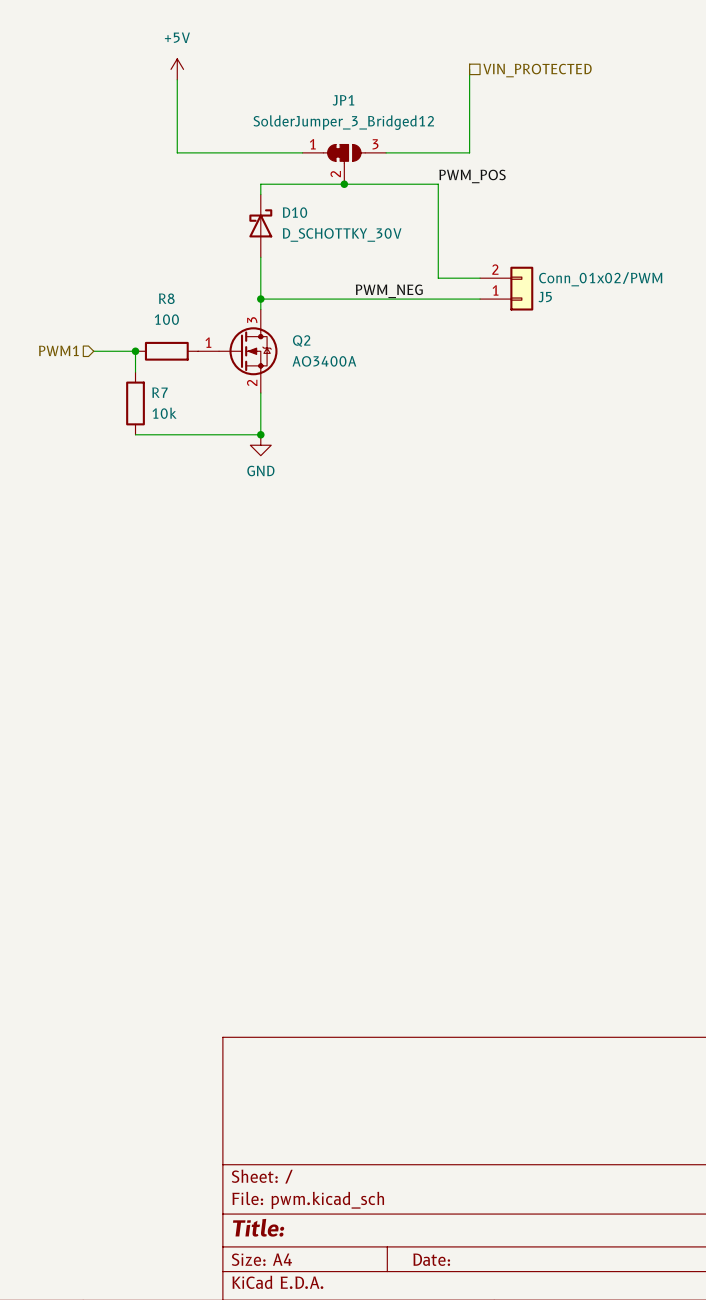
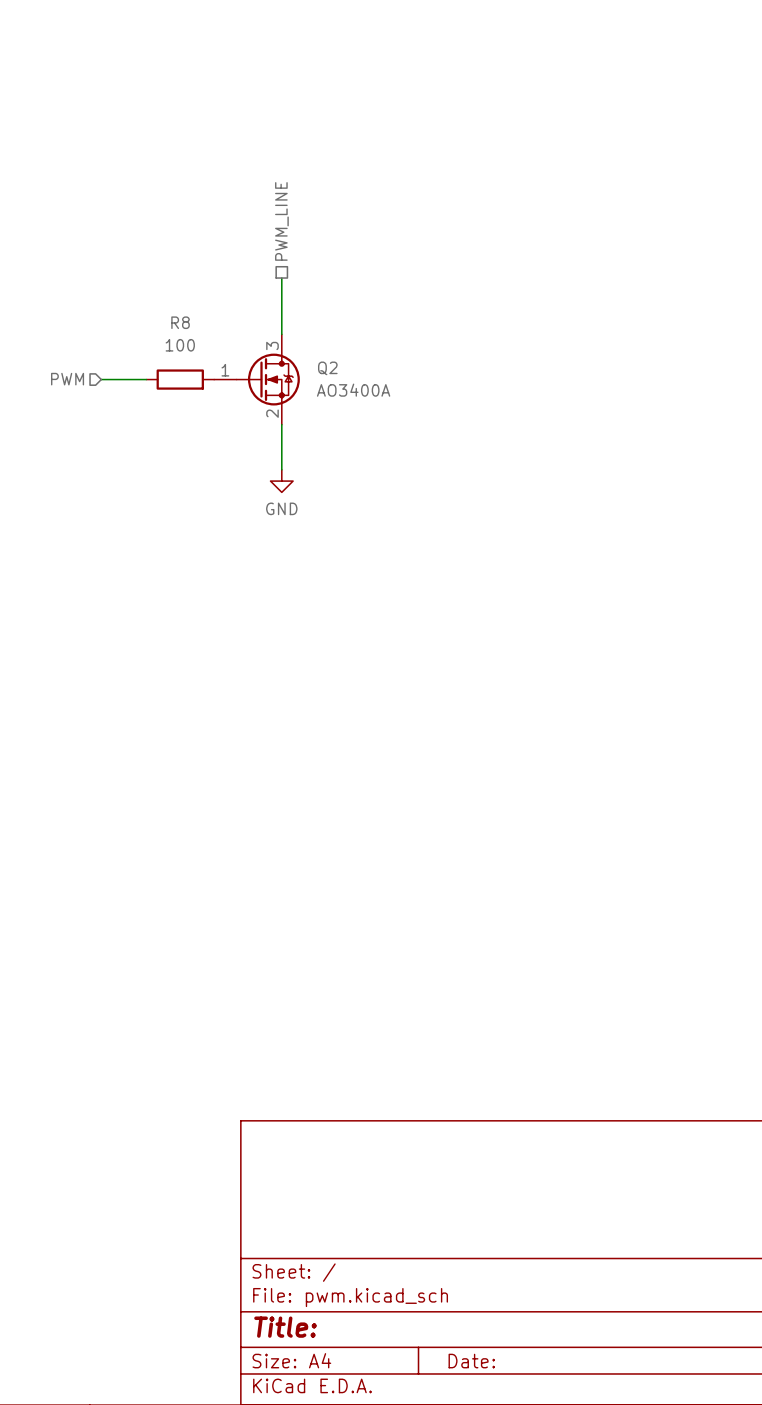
power symbol: +5V (177, 69) -> none
wire: (469, 69) (469, 152) (386, 152) -> none
hierarchical label: VIN_PROTECTED (537, 70) -> none
wire: (177, 79) (177, 152) (302, 152) -> none
JP1: SolderJumper_3_Bridged12 (344, 164) -> none
label: PWM_POS (472, 176) -> none
junction: (344, 184) -> none
wire: (260, 194) (260, 184) (438, 184) (438, 278) (480, 278) -> none
hierarchical label: none -> PWM_LINE (281, 221)
D10: D_SCHOTTKY_30V (260, 225) -> none
J5: Conn_01x02/PWM (506, 288) -> none
label: PWM_NEG (389, 291) -> none
wire: (260, 299) (480, 299) -> none
junction: (260, 299) -> none
hierarchical label: PWM1 (58, 350) -> PWM (67, 379)
wire: (135, 351) (135, 372) -> none
junction: (135, 351) -> none
R7: 10k (135, 403) -> none
wire: (135, 434) (260, 434) -> none
junction: (260, 434) -> none

